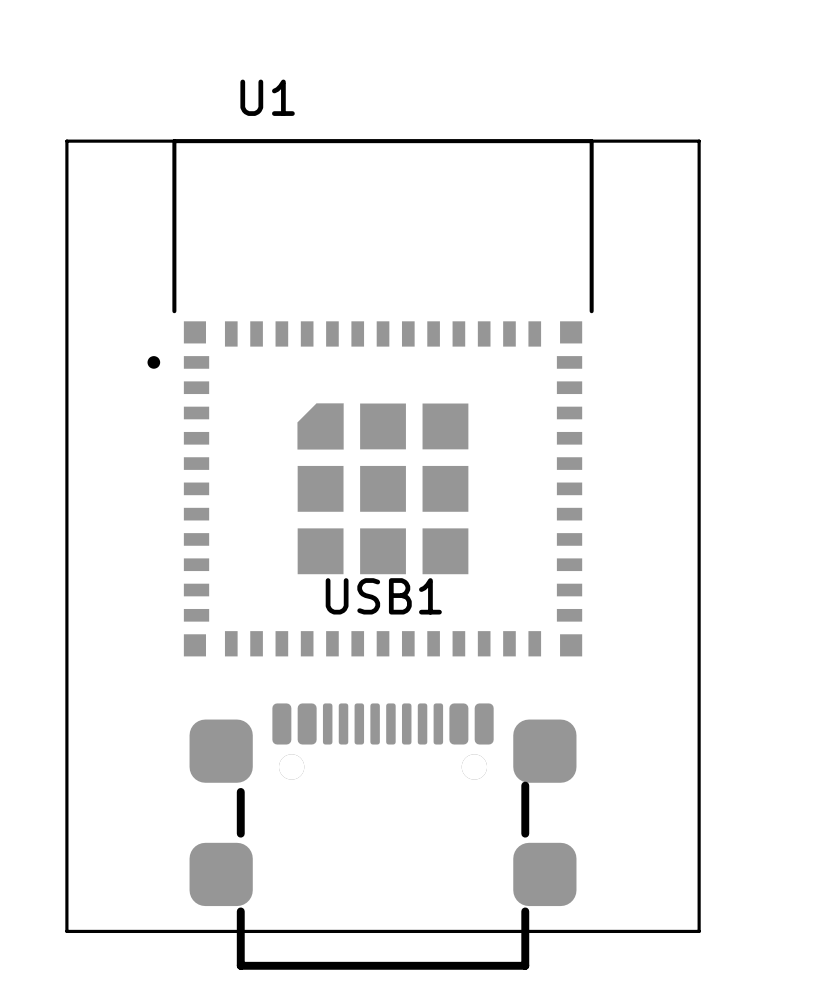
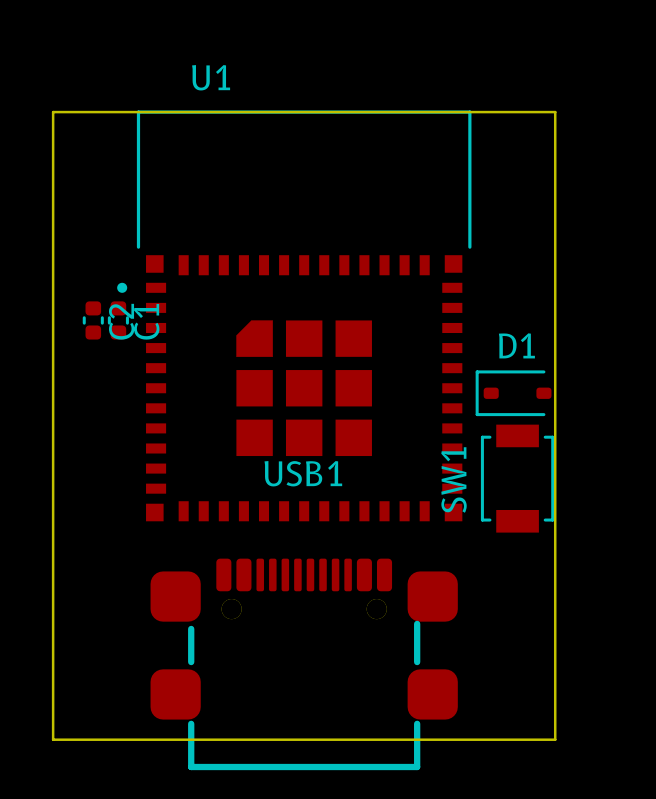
C2: none -> (93, 320)
C1: none -> (118, 320)
D1: none -> (513, 393)
SW1: none -> (517, 478)

